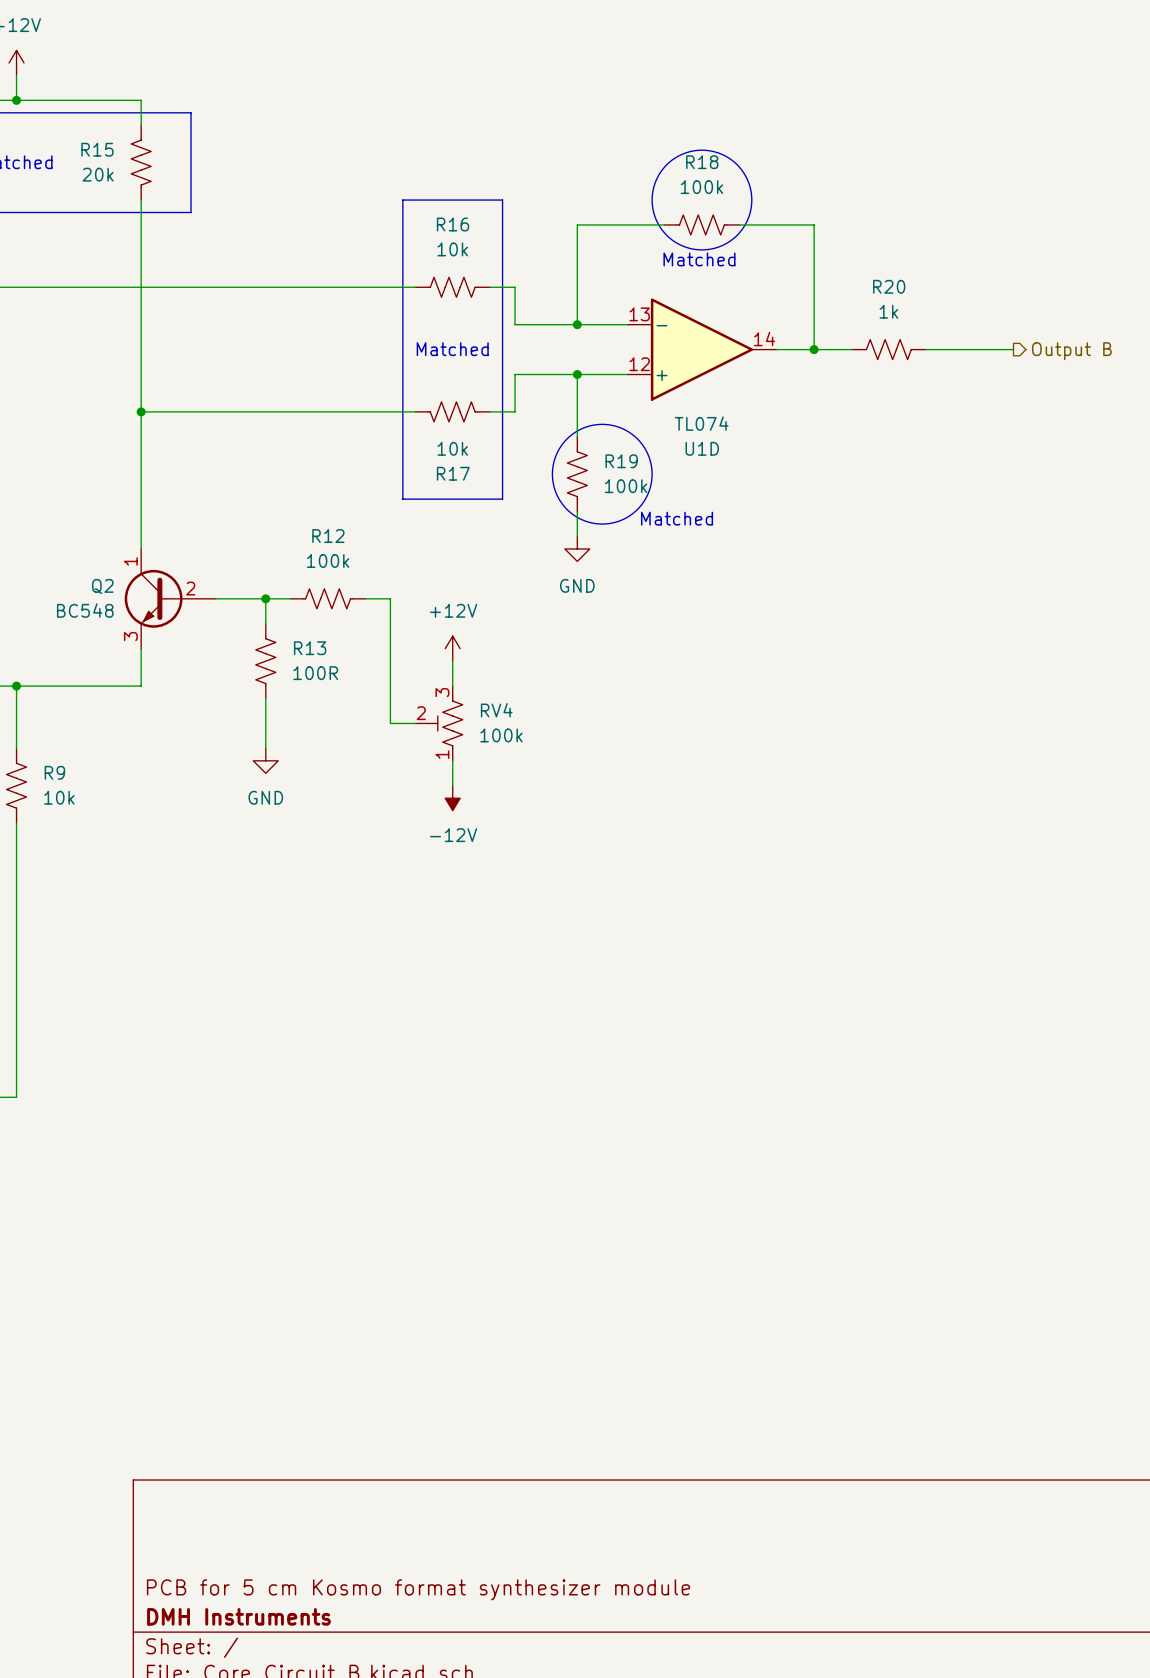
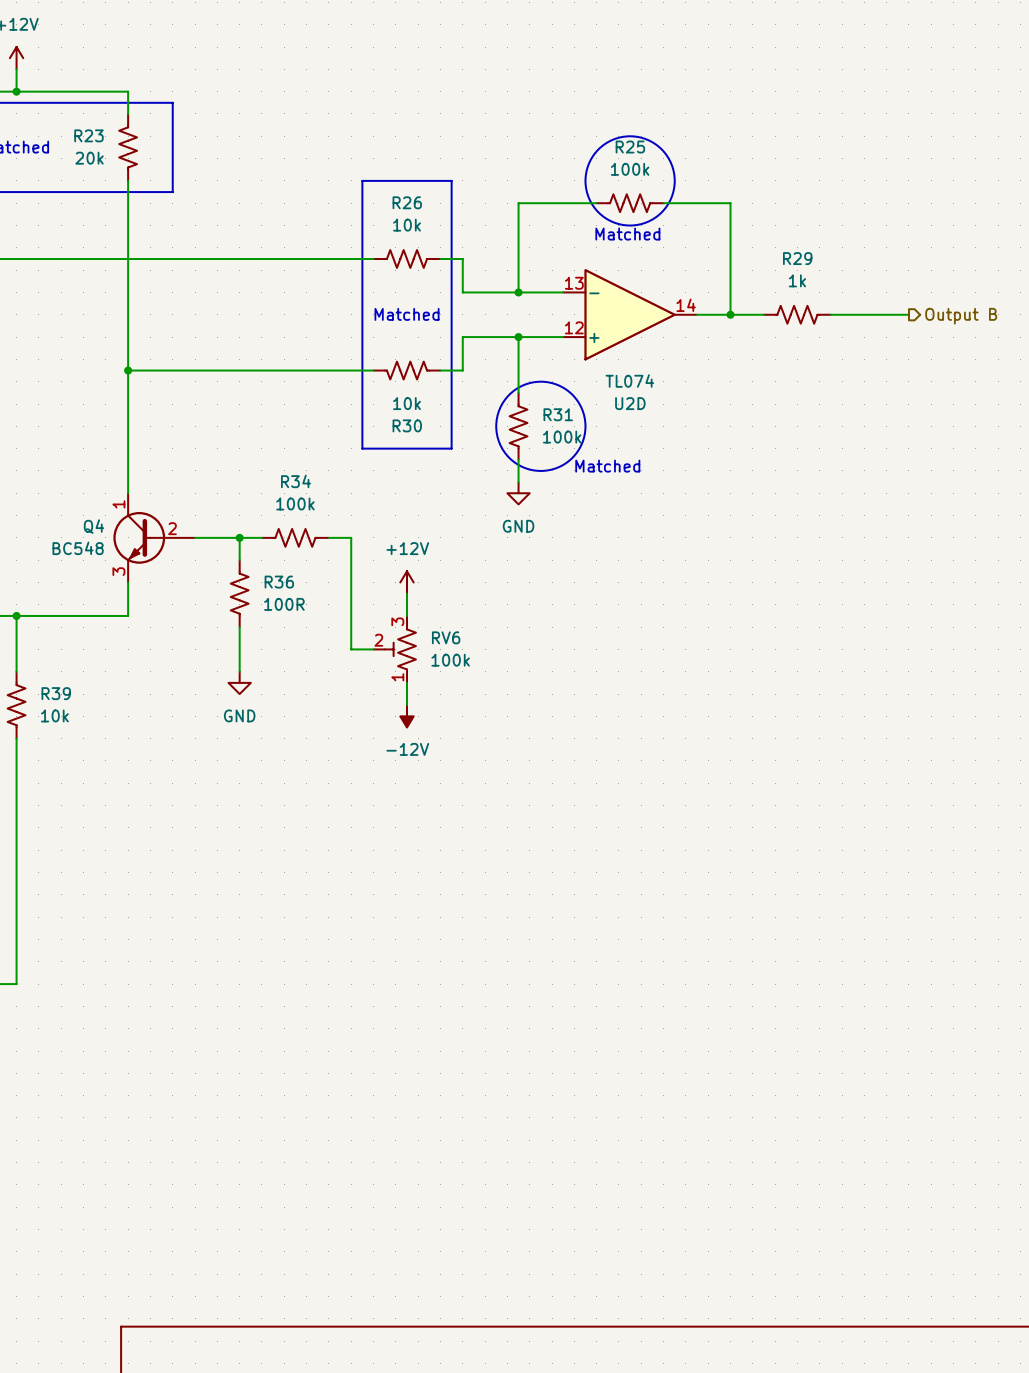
R15 name: R15 (97, 149) -> R23 (88, 135)
R18 name: R18 (702, 162) -> R25 (630, 147)
R16 name: R16 (453, 224) -> R26 (407, 202)
R20 name: R20 (889, 286) -> R29 (797, 258)
U1D name: U1D (702, 448) -> U2D (630, 403)
R19 name: R19 (621, 461) -> R31 (558, 414)
R17 name: R17 (453, 473) -> R30 (407, 425)
R12 name: R12 (328, 536) -> R34 (295, 481)
Q2 name: Q2 (102, 586) -> Q4 (94, 526)
R13 name: R13 (310, 648) -> R36 (279, 582)
RV4 name: RV4 (496, 710) -> RV6 (446, 637)
R9 name: R9 (54, 772) -> R39 (56, 693)

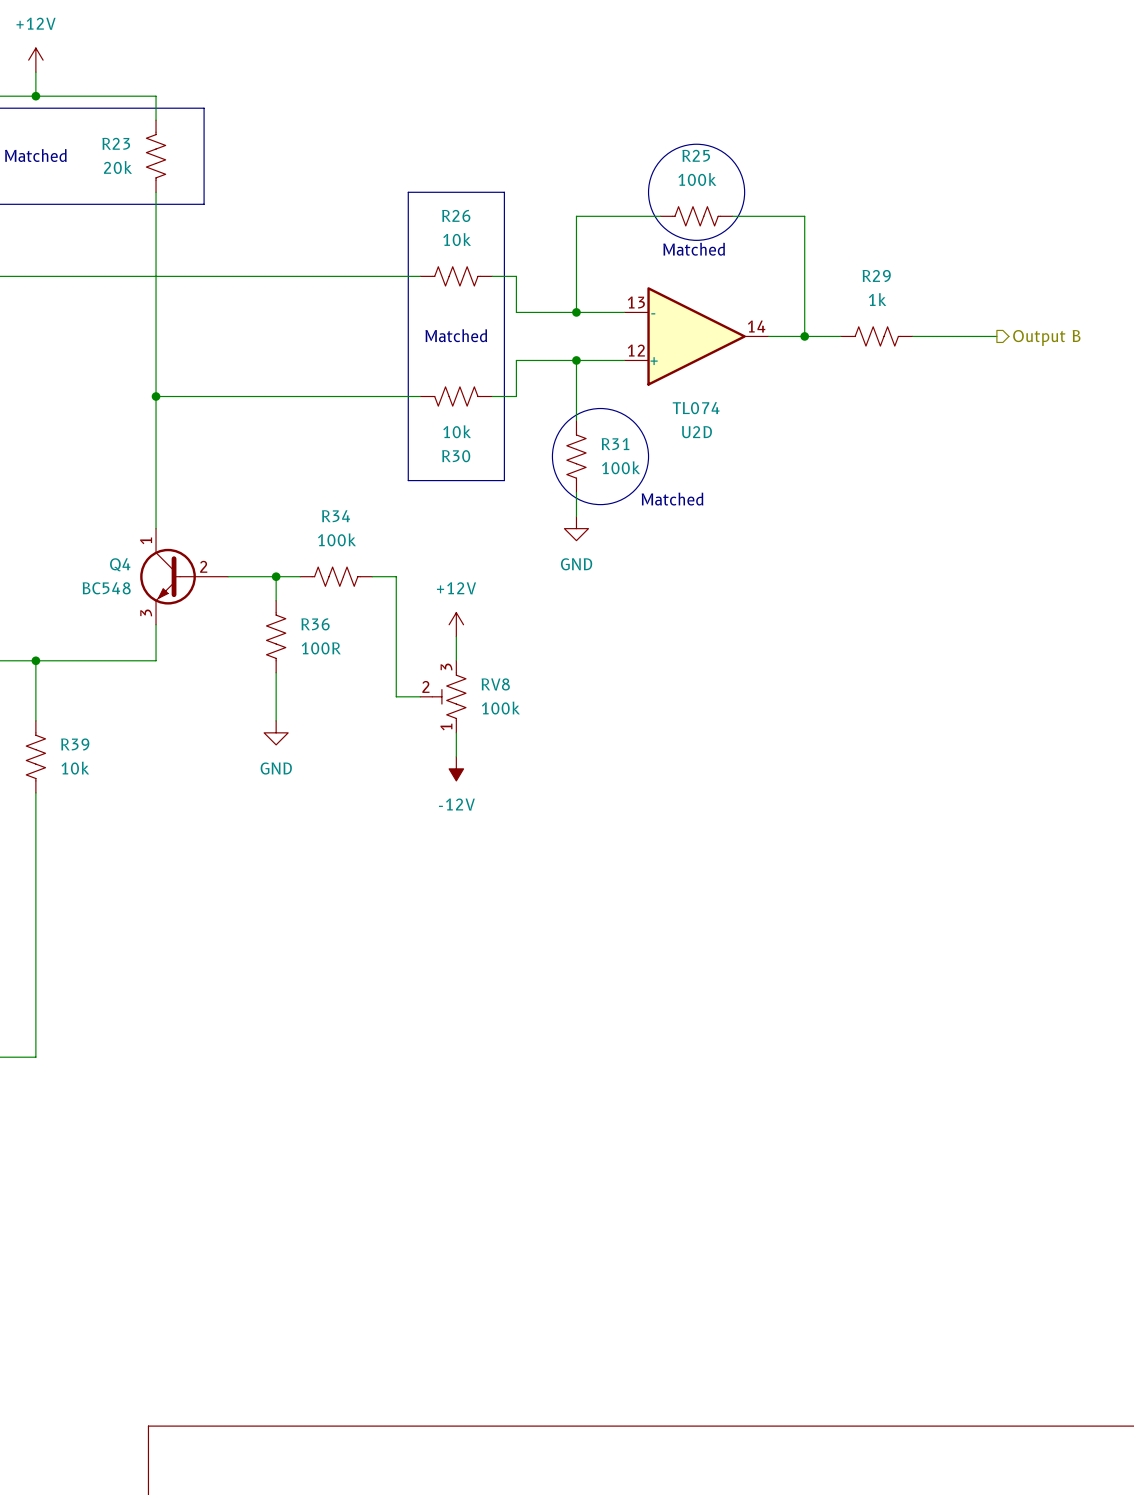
RV6 name: RV6 (446, 637) -> RV8 (495, 684)

